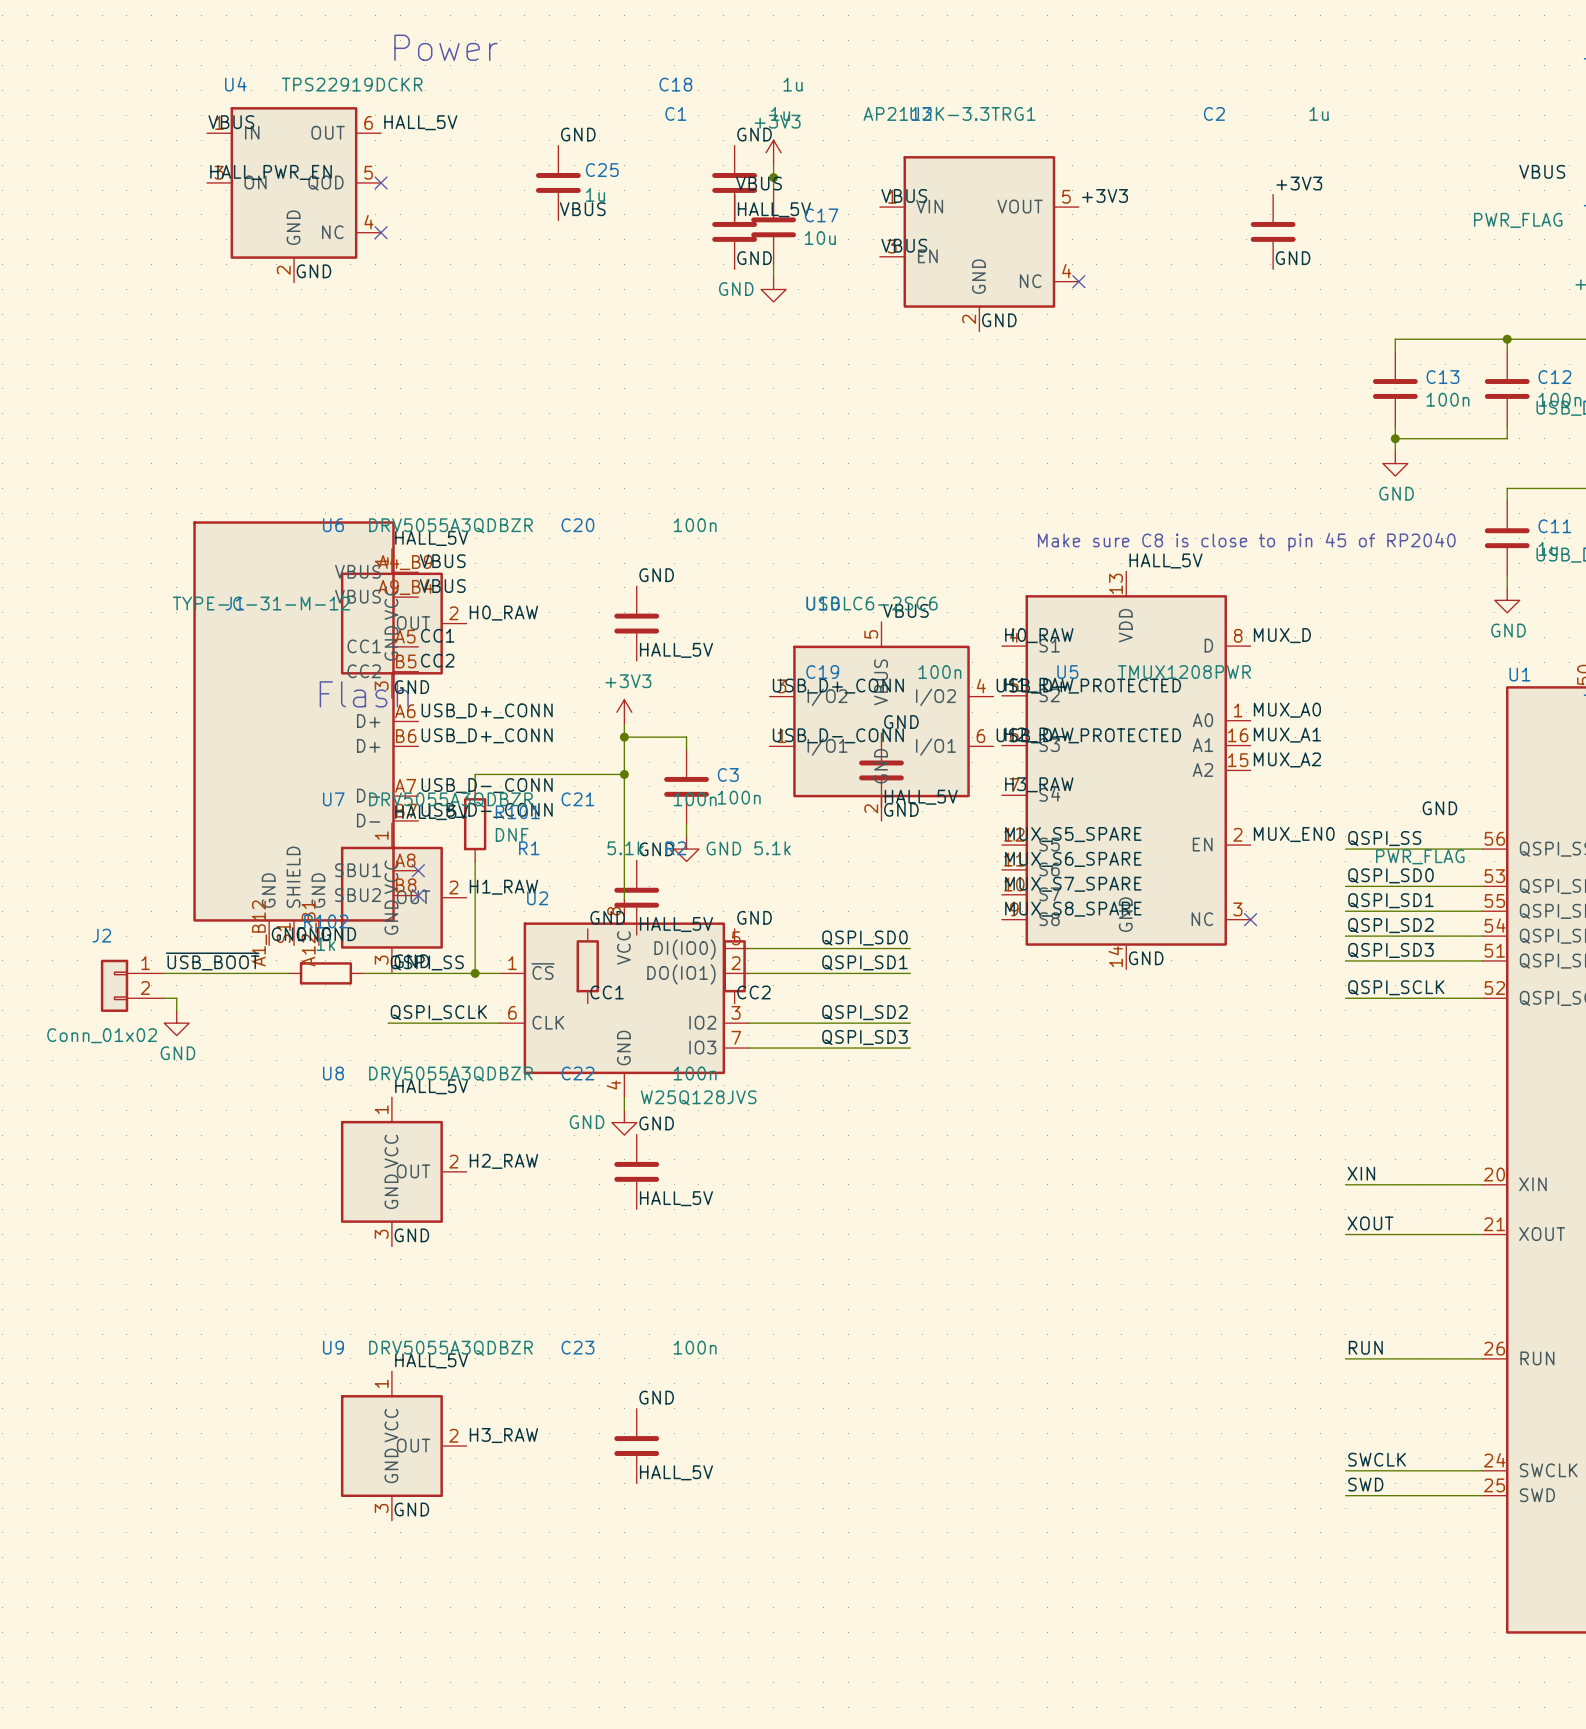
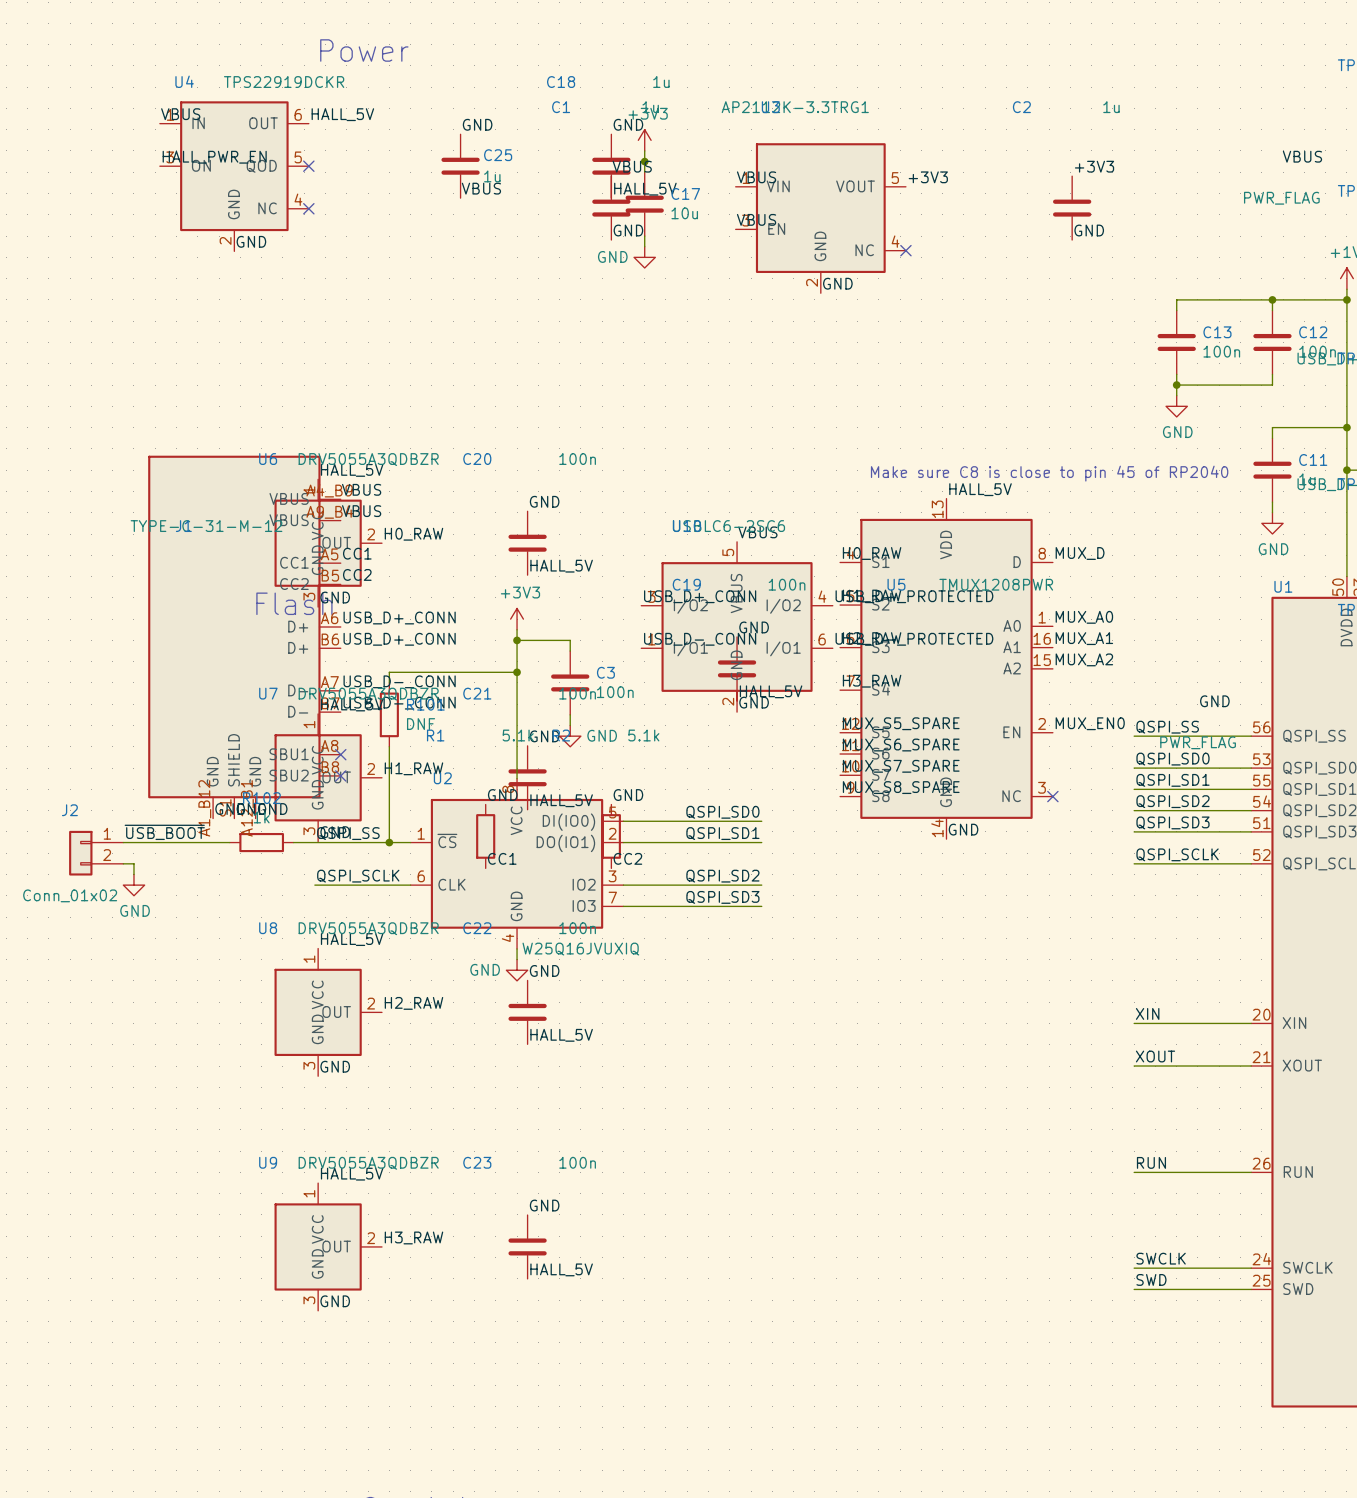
U2 value: W25Q128JVS (698, 1097) -> W25Q16JVUXIQ (580, 949)

